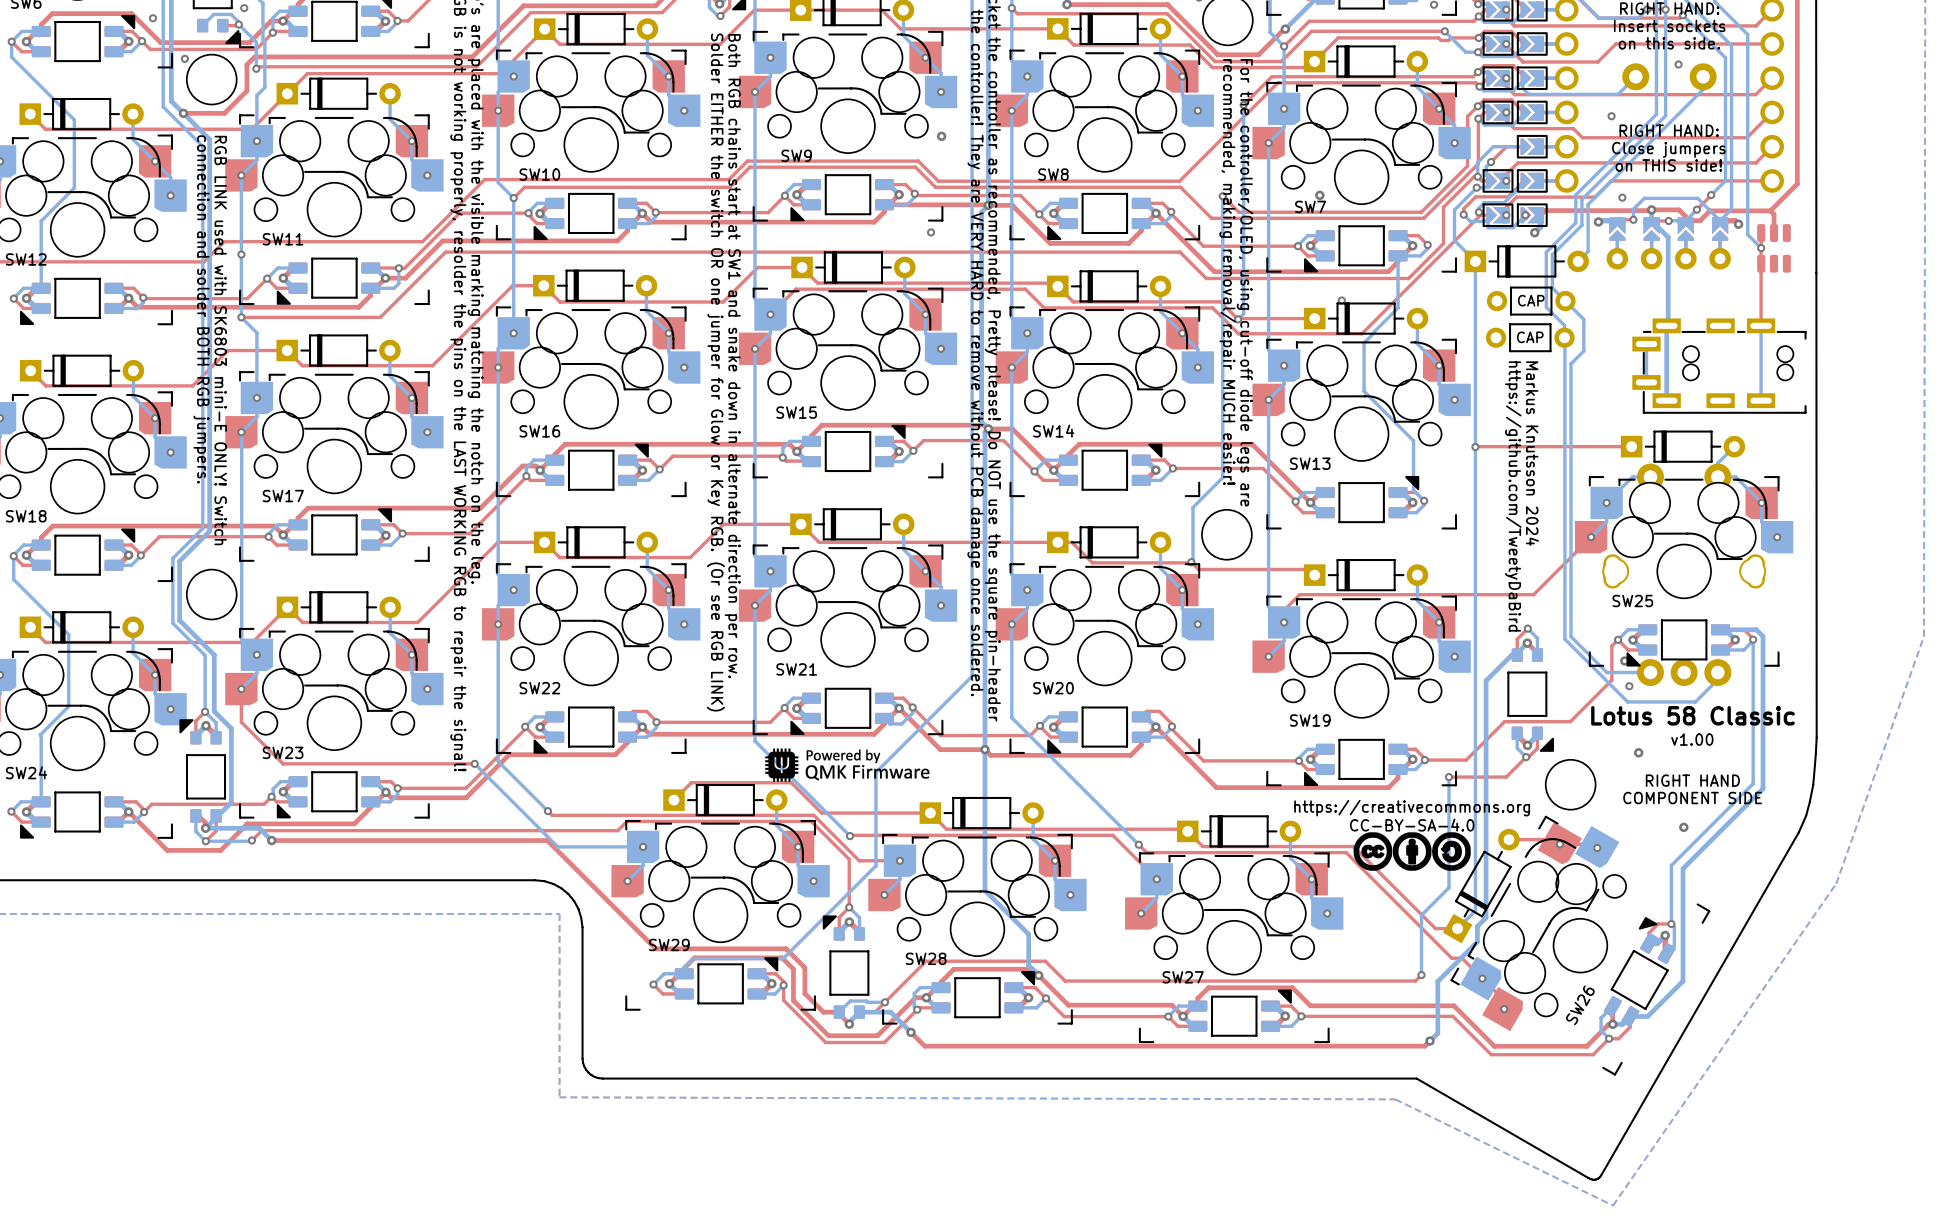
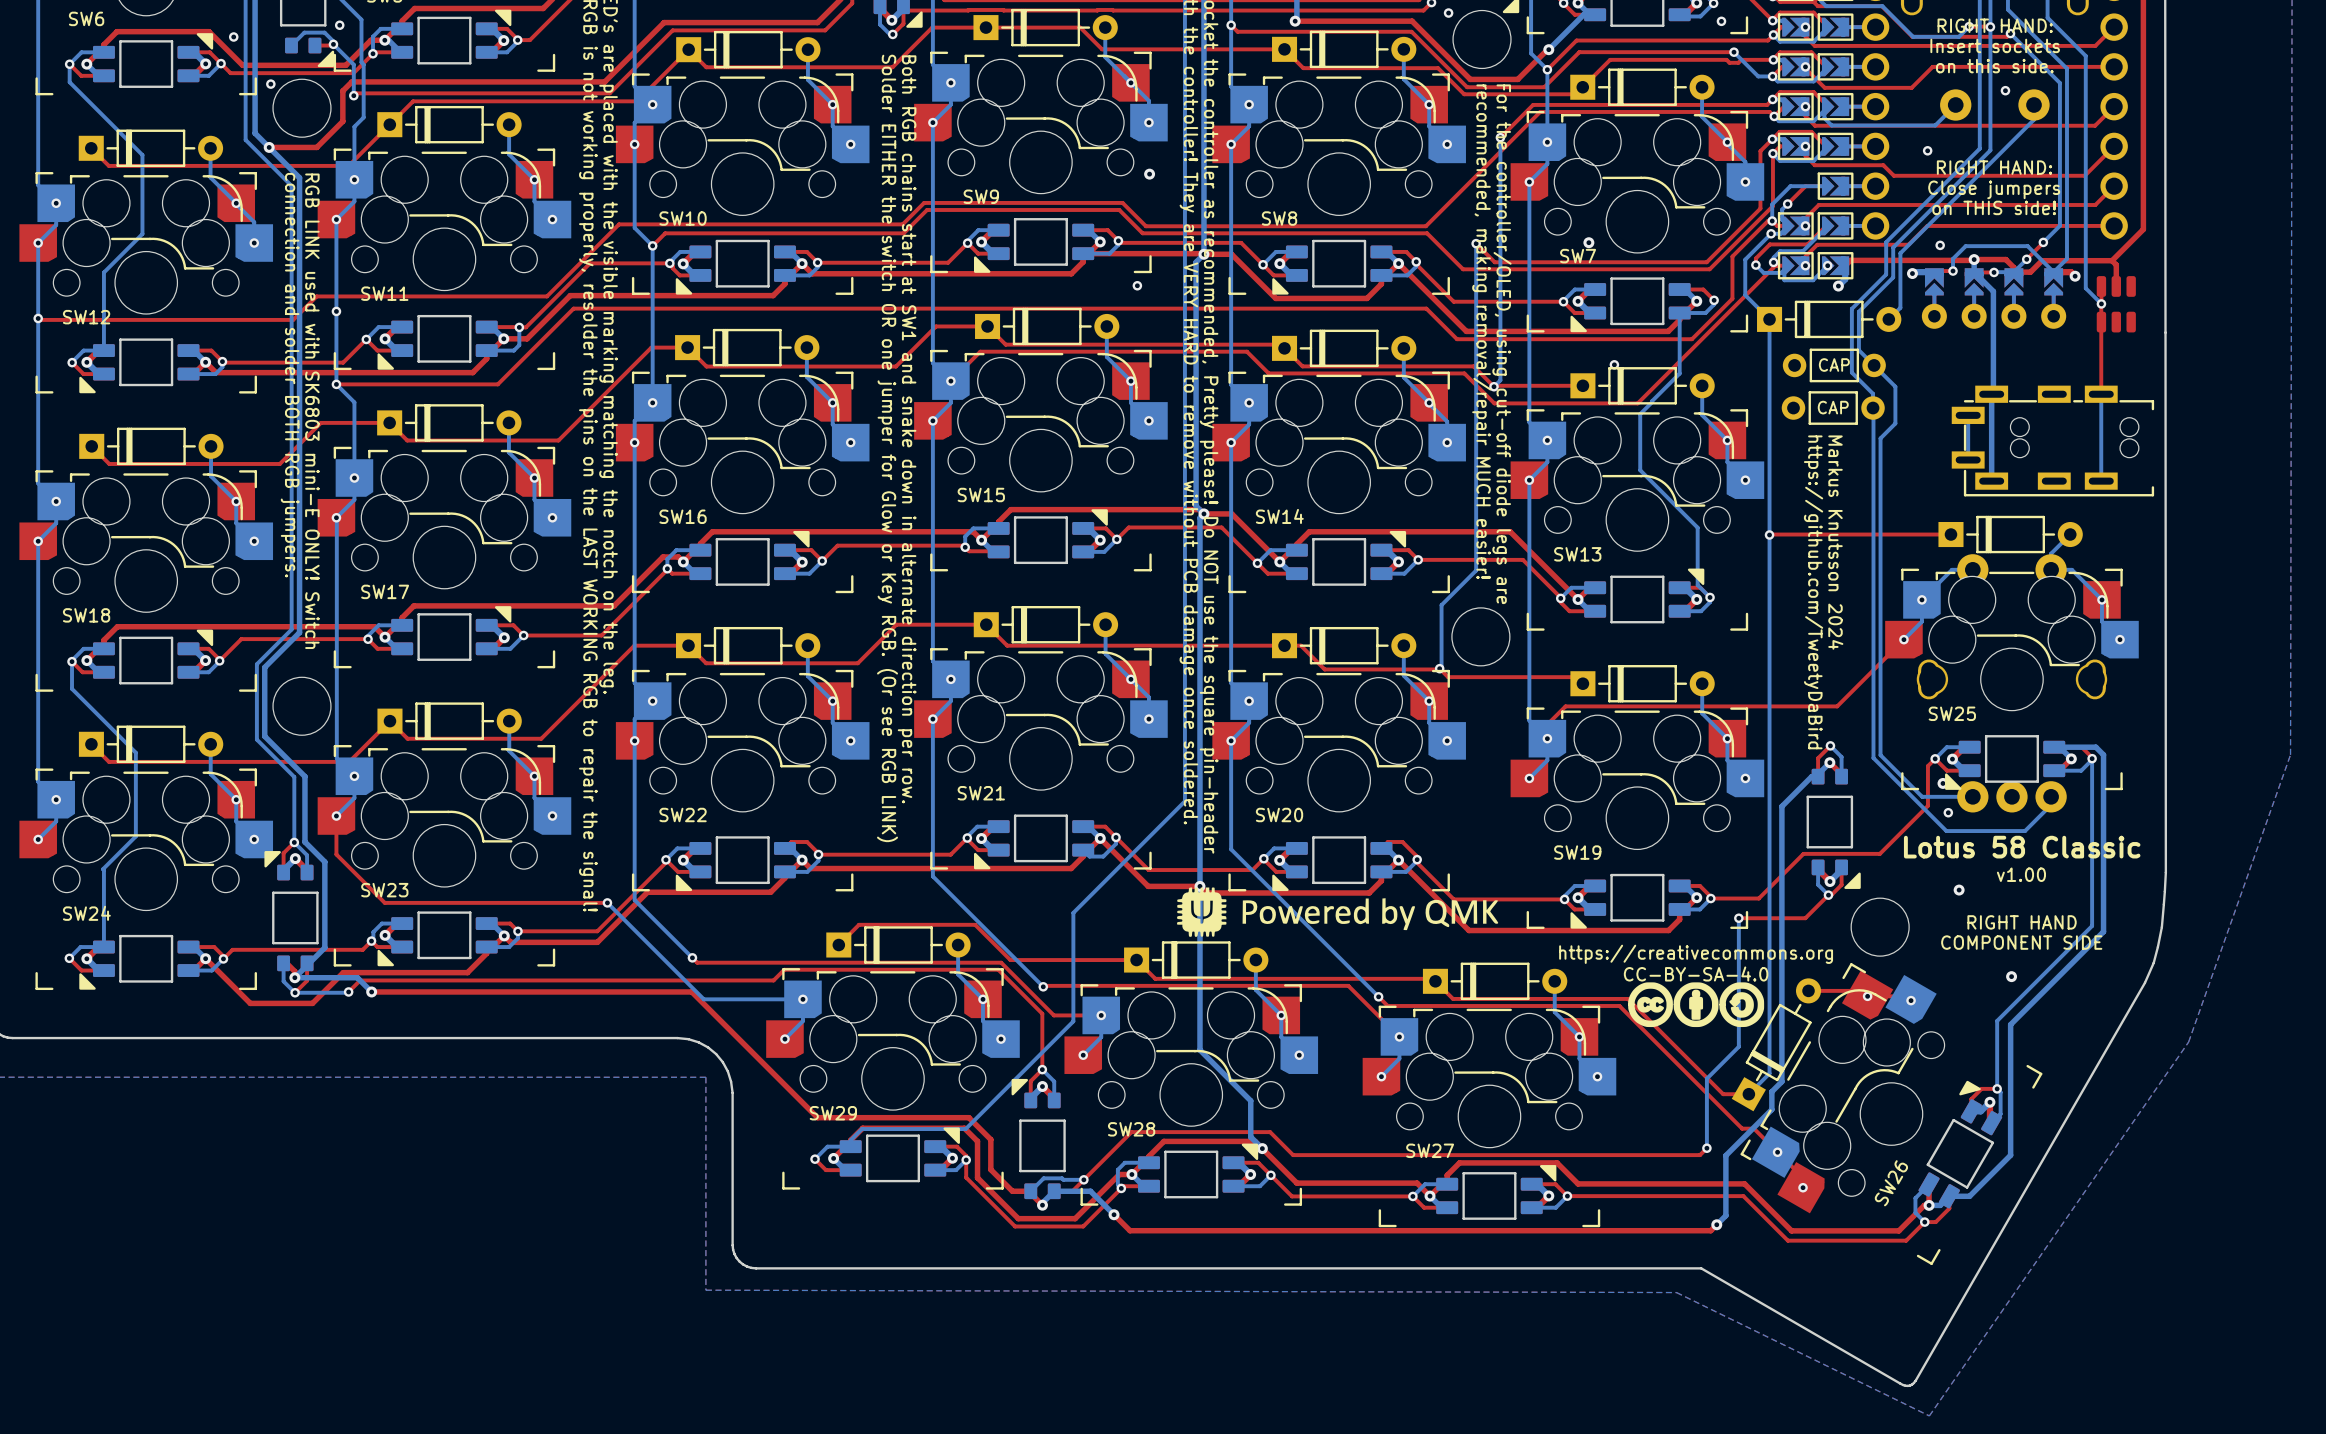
drawing: [765, 748, 930, 782] -> none
drawing: none -> [1177, 887, 1499, 937]

